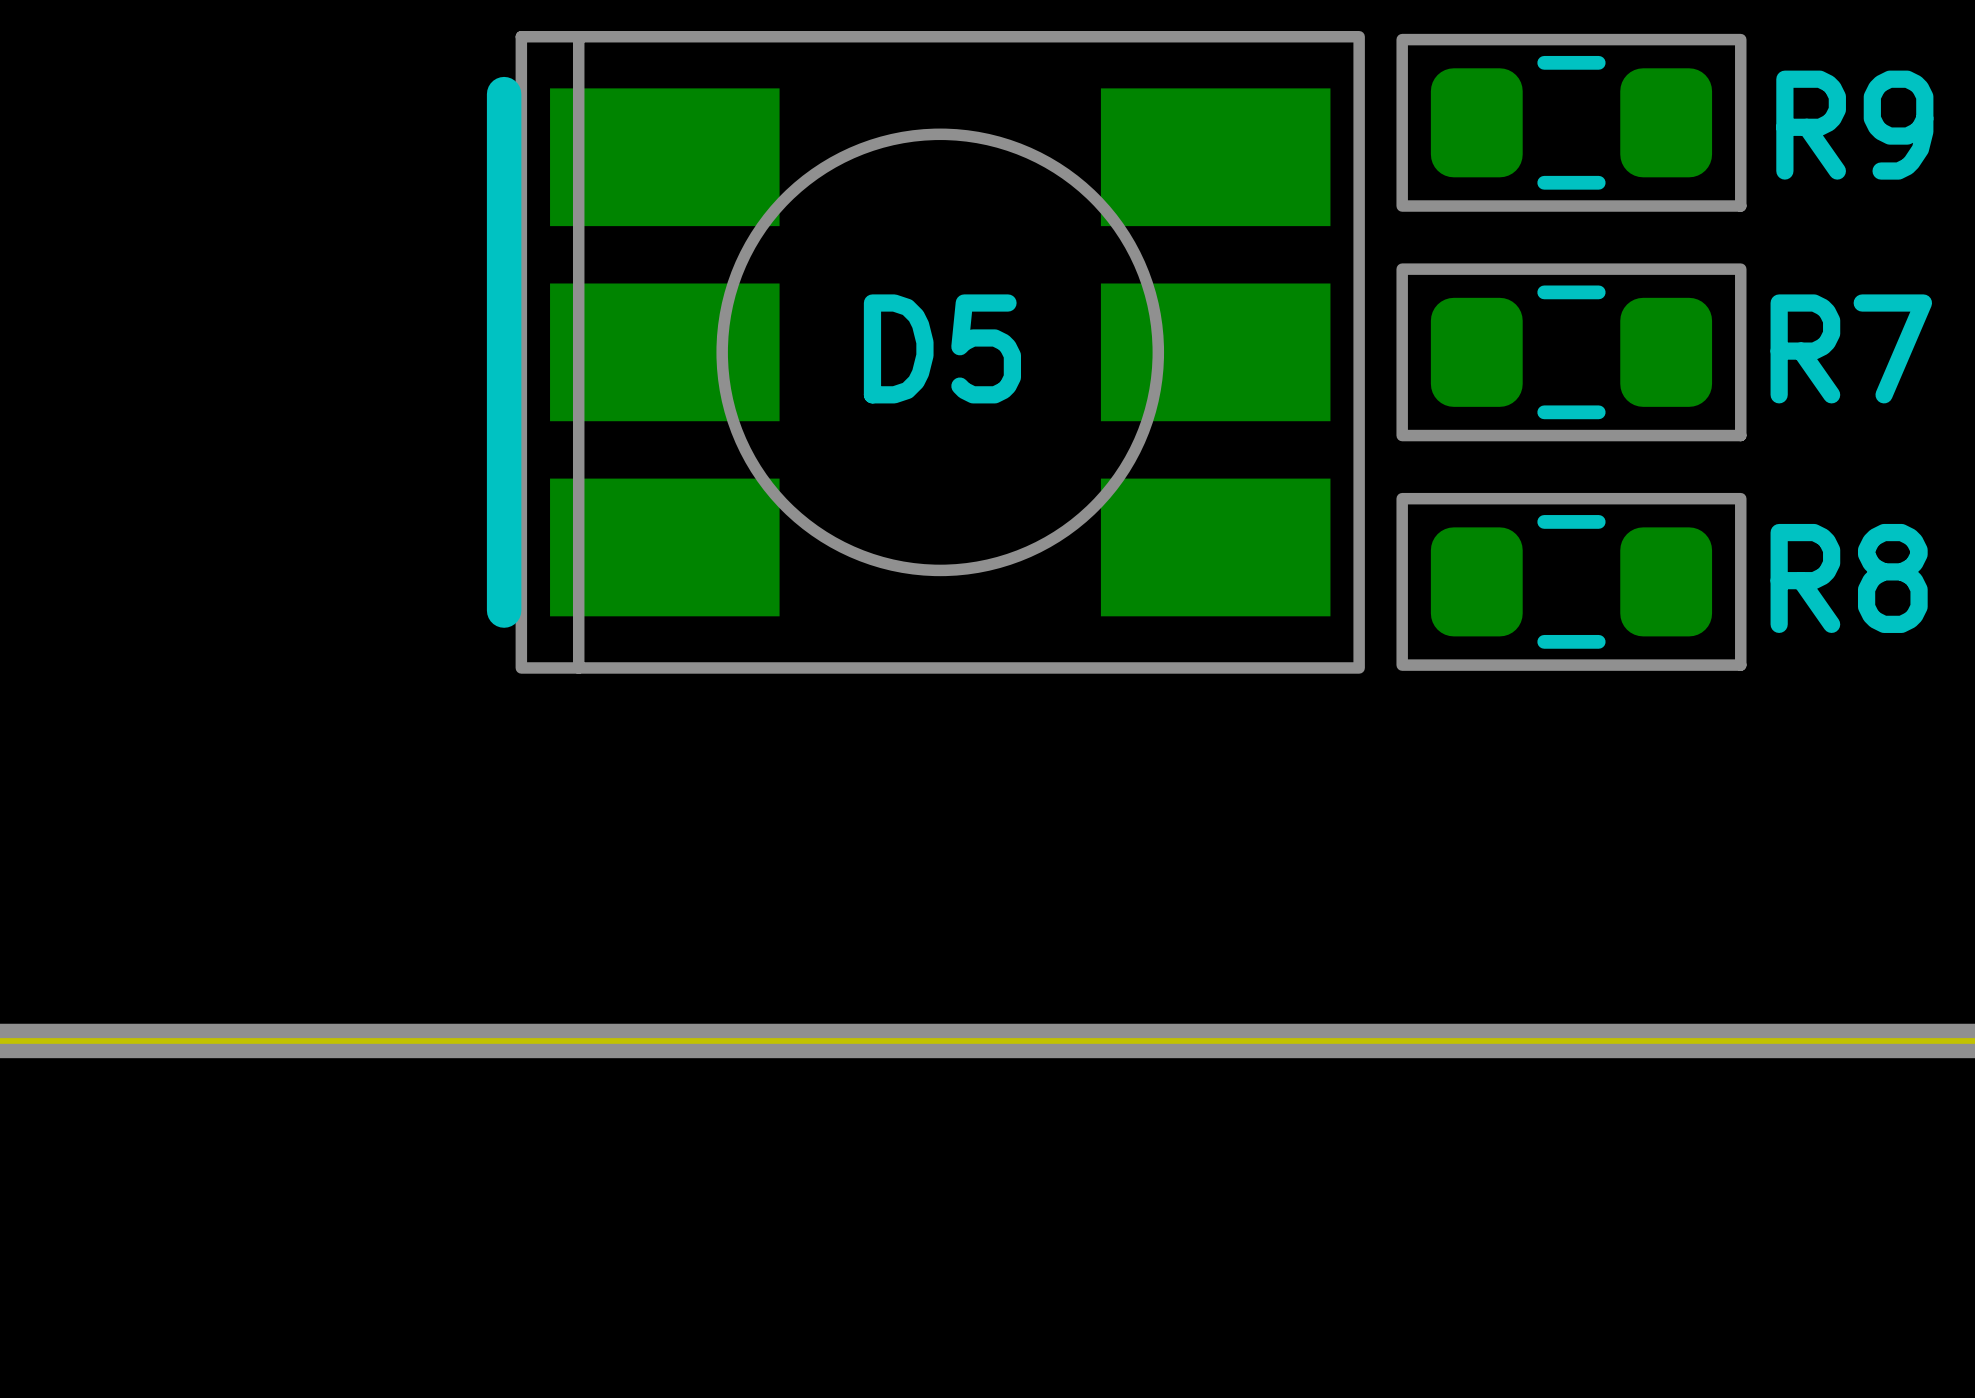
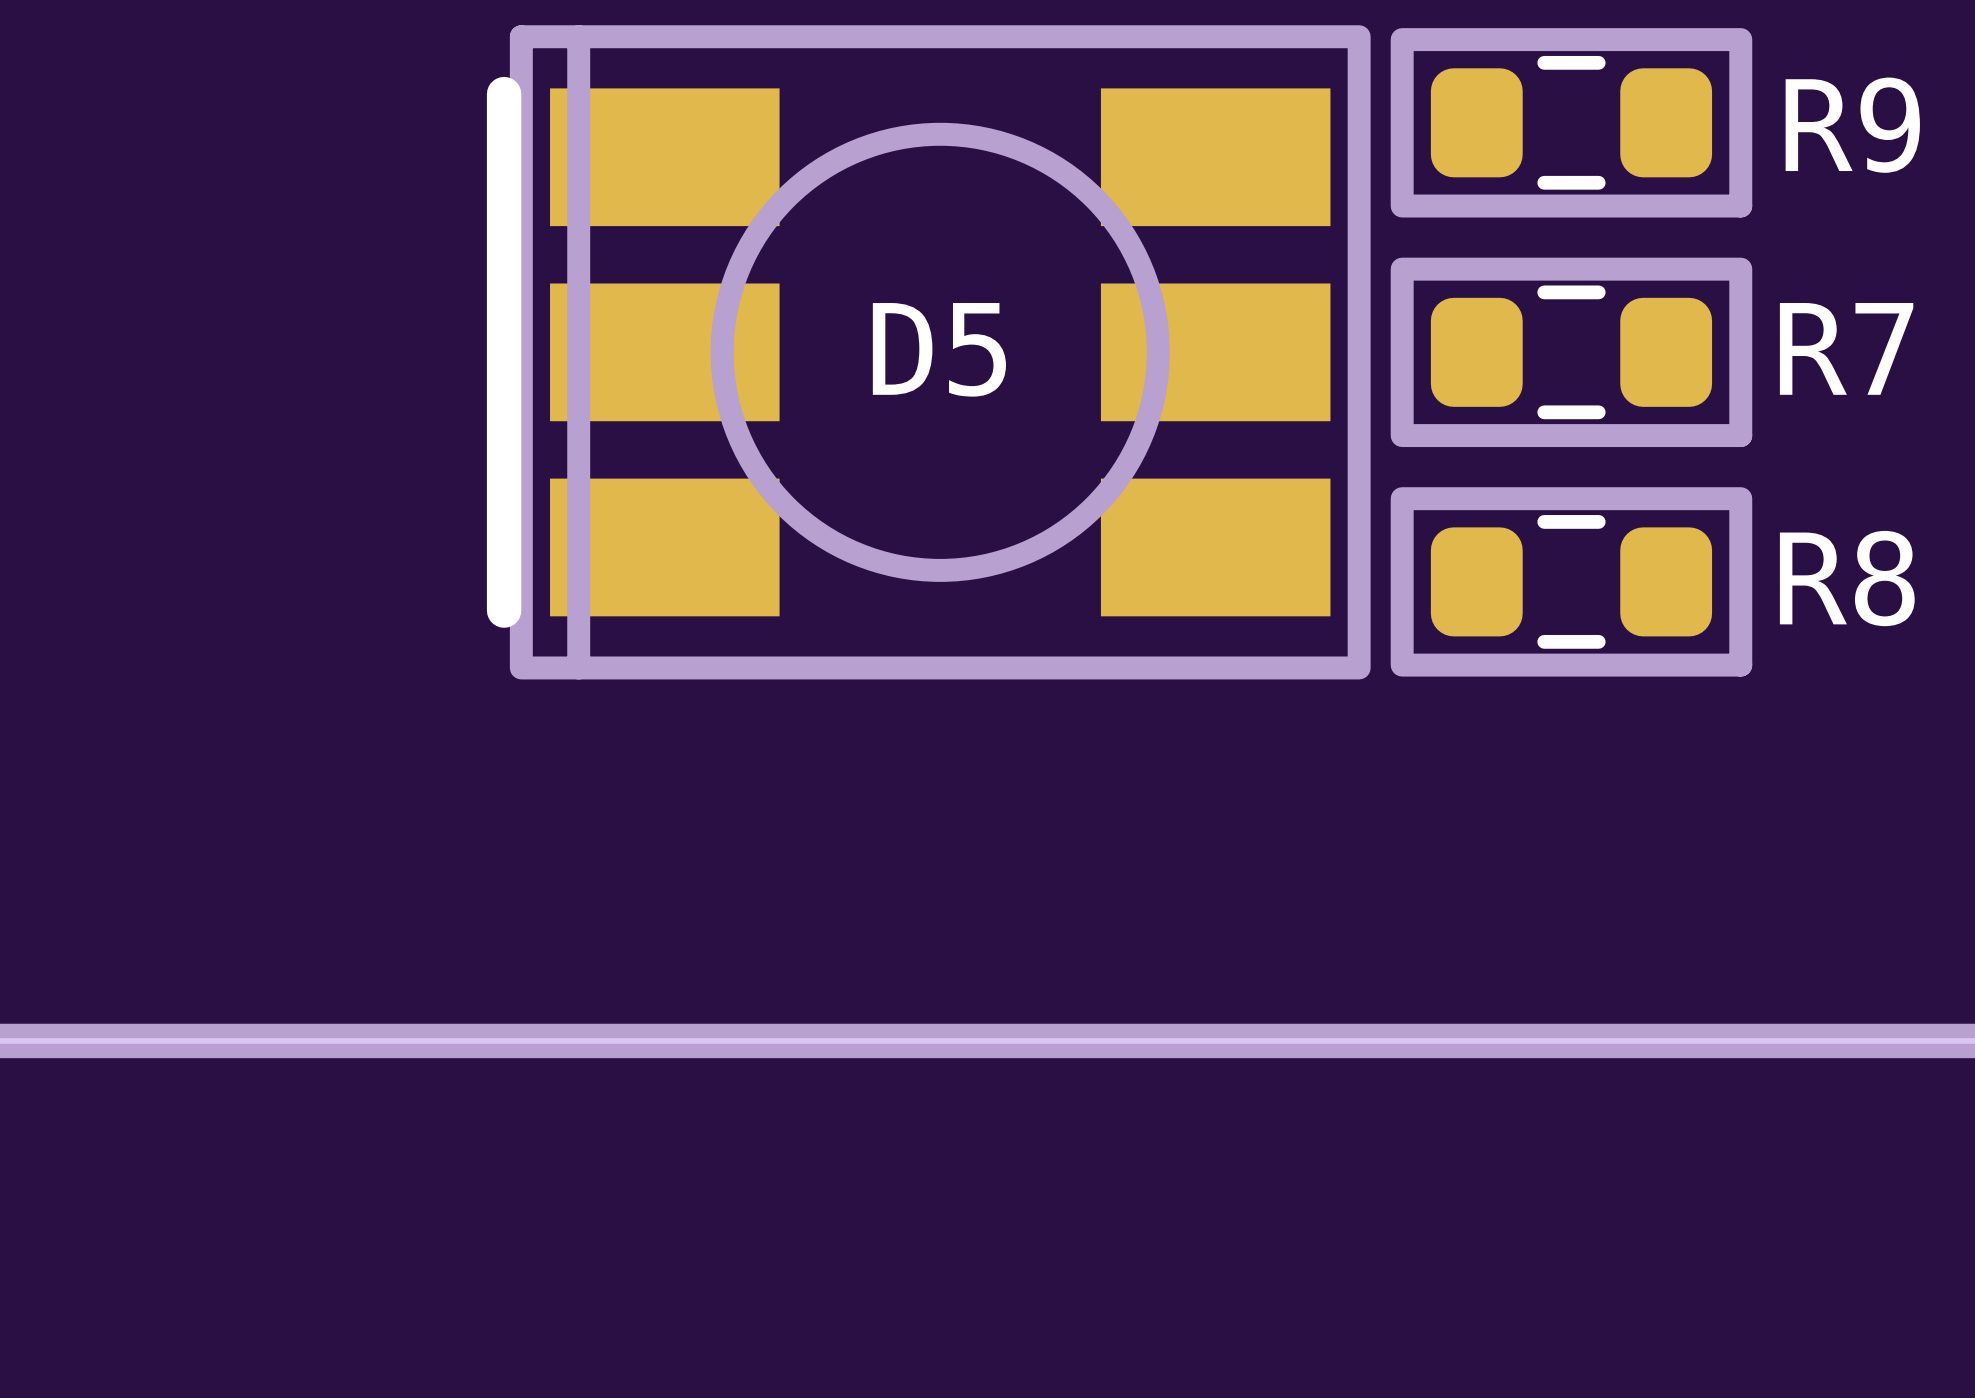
D5 footprint: [486, 30, 1365, 674] -> [486, 25, 1371, 680]
R9 footprint: [1396, 33, 1747, 212] -> [1390, 28, 1753, 218]
R7 footprint: [1396, 263, 1747, 442] -> [1390, 257, 1753, 448]
R8 footprint: [1396, 492, 1747, 671] -> [1390, 487, 1753, 677]

